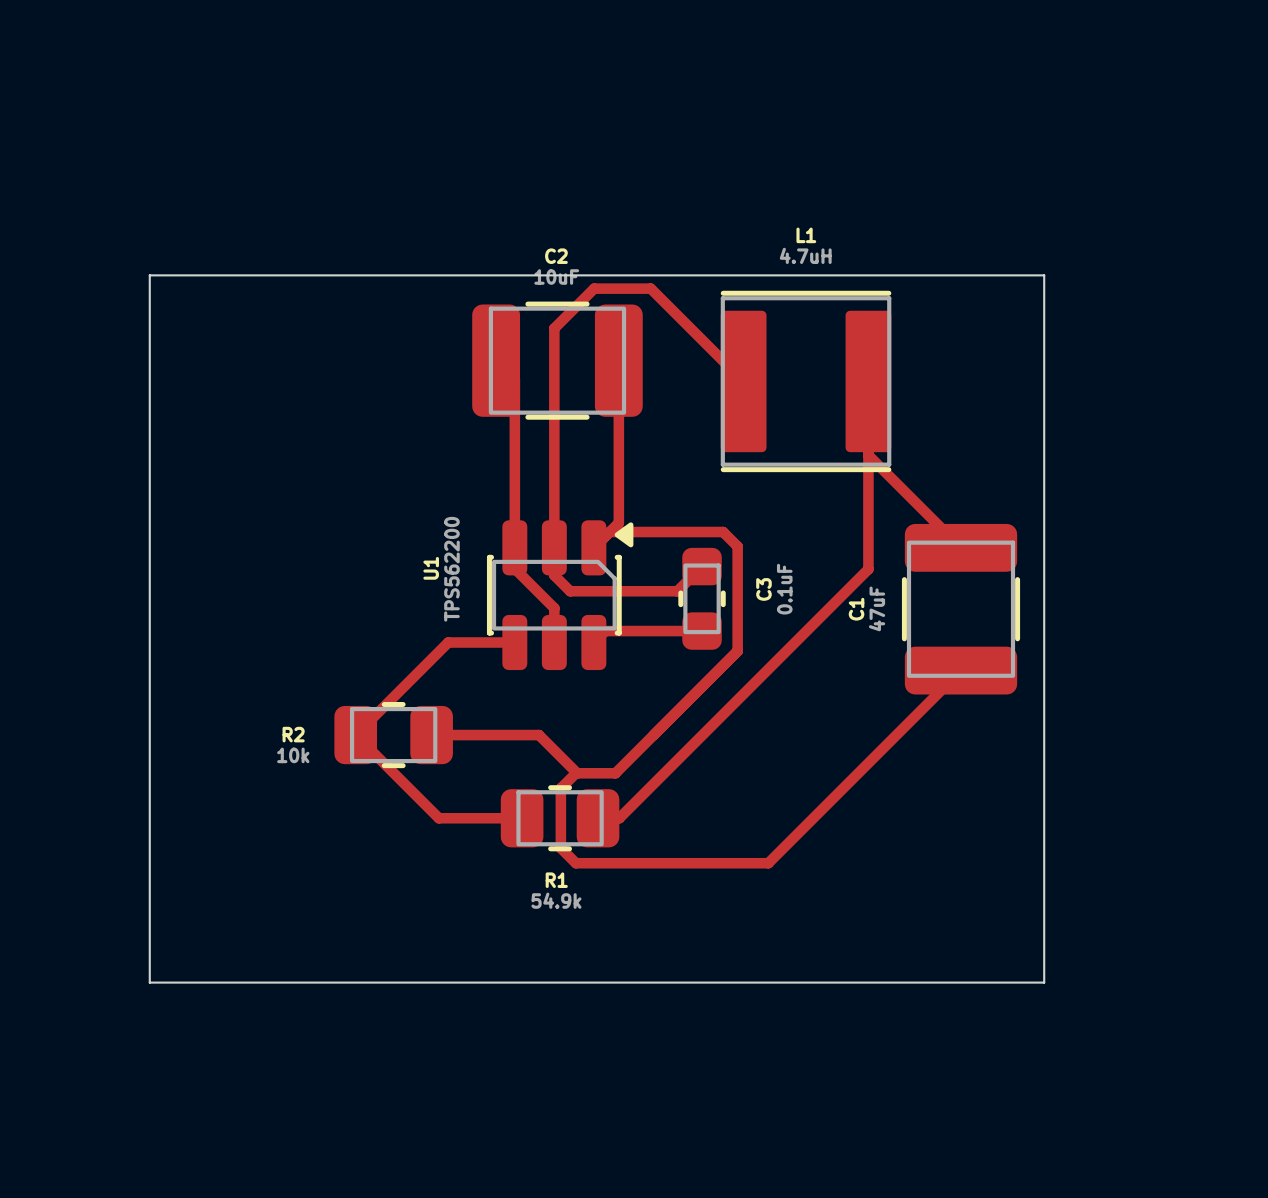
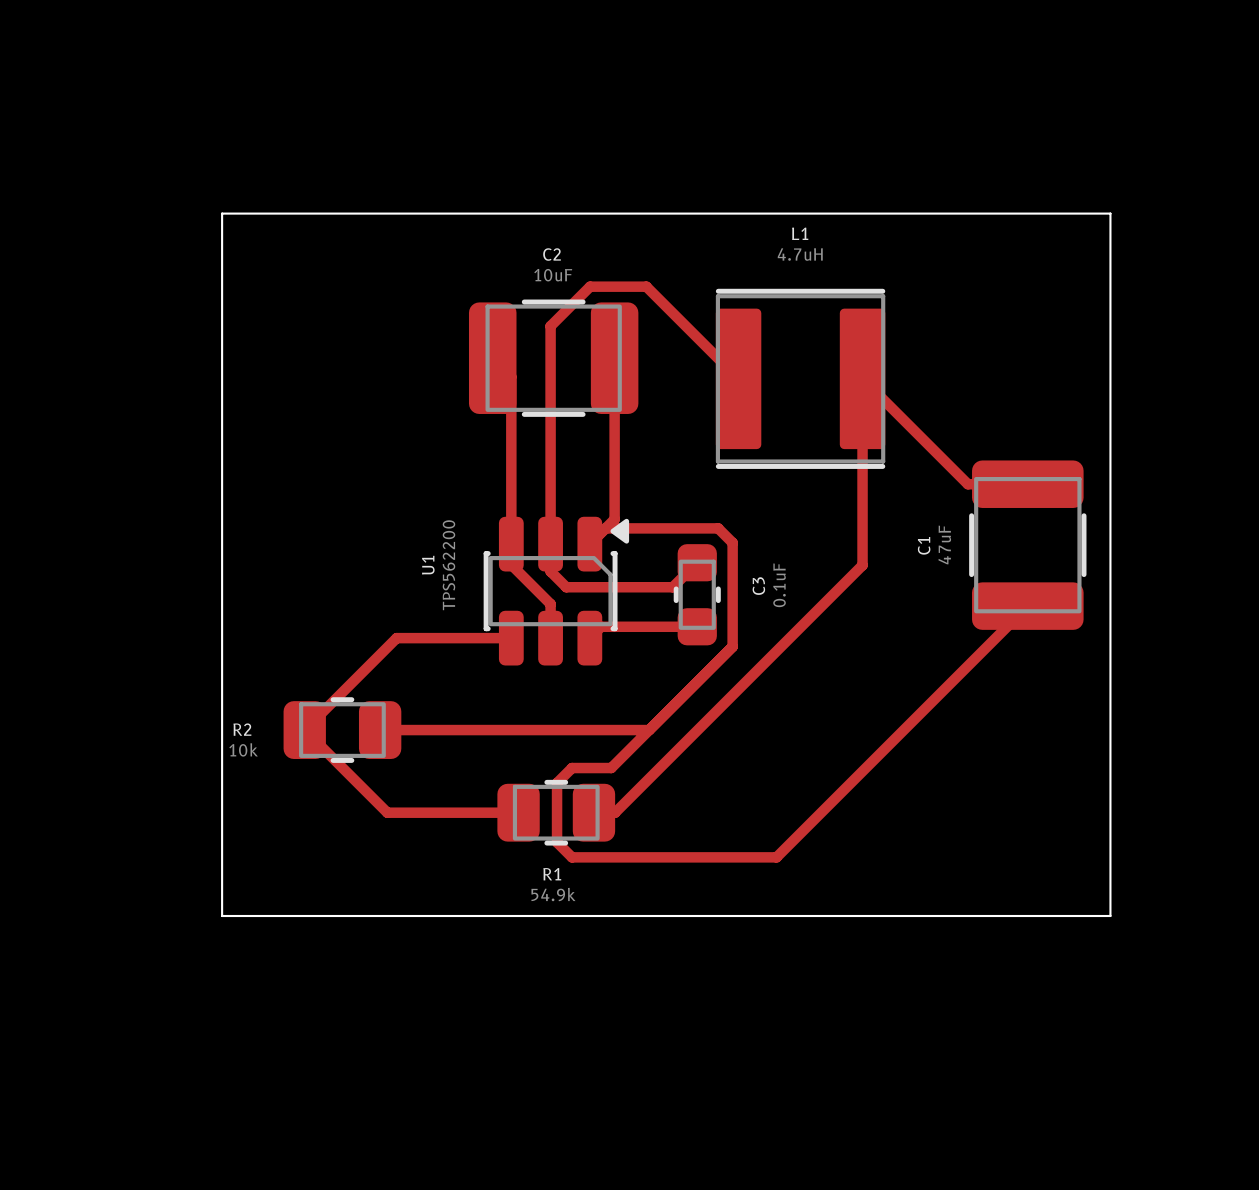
board edge: (149, 275) (1044, 275) (1044, 982) (149, 982) (149, 275) -> (222, 213) (222, 916) (1110, 916) (1110, 213) (222, 213)
track: none -> (862, 378) (967, 484) (1027, 484)
track: (868, 455) (961, 547) -> none
C1 position: (961, 609) -> (1027, 545)
track: (448, 642) (355, 735) (438, 818) -> (445, 638) (396, 638) (304, 730) (387, 812) (435, 812)
track: (961, 670) (768, 863) -> (1027, 606) (776, 857) (763, 857)
track: none -> (380, 730) (428, 730)
R2 position: (393, 735) -> (342, 730)
track: (539, 735) (577, 773) -> (535, 730) (649, 730)

